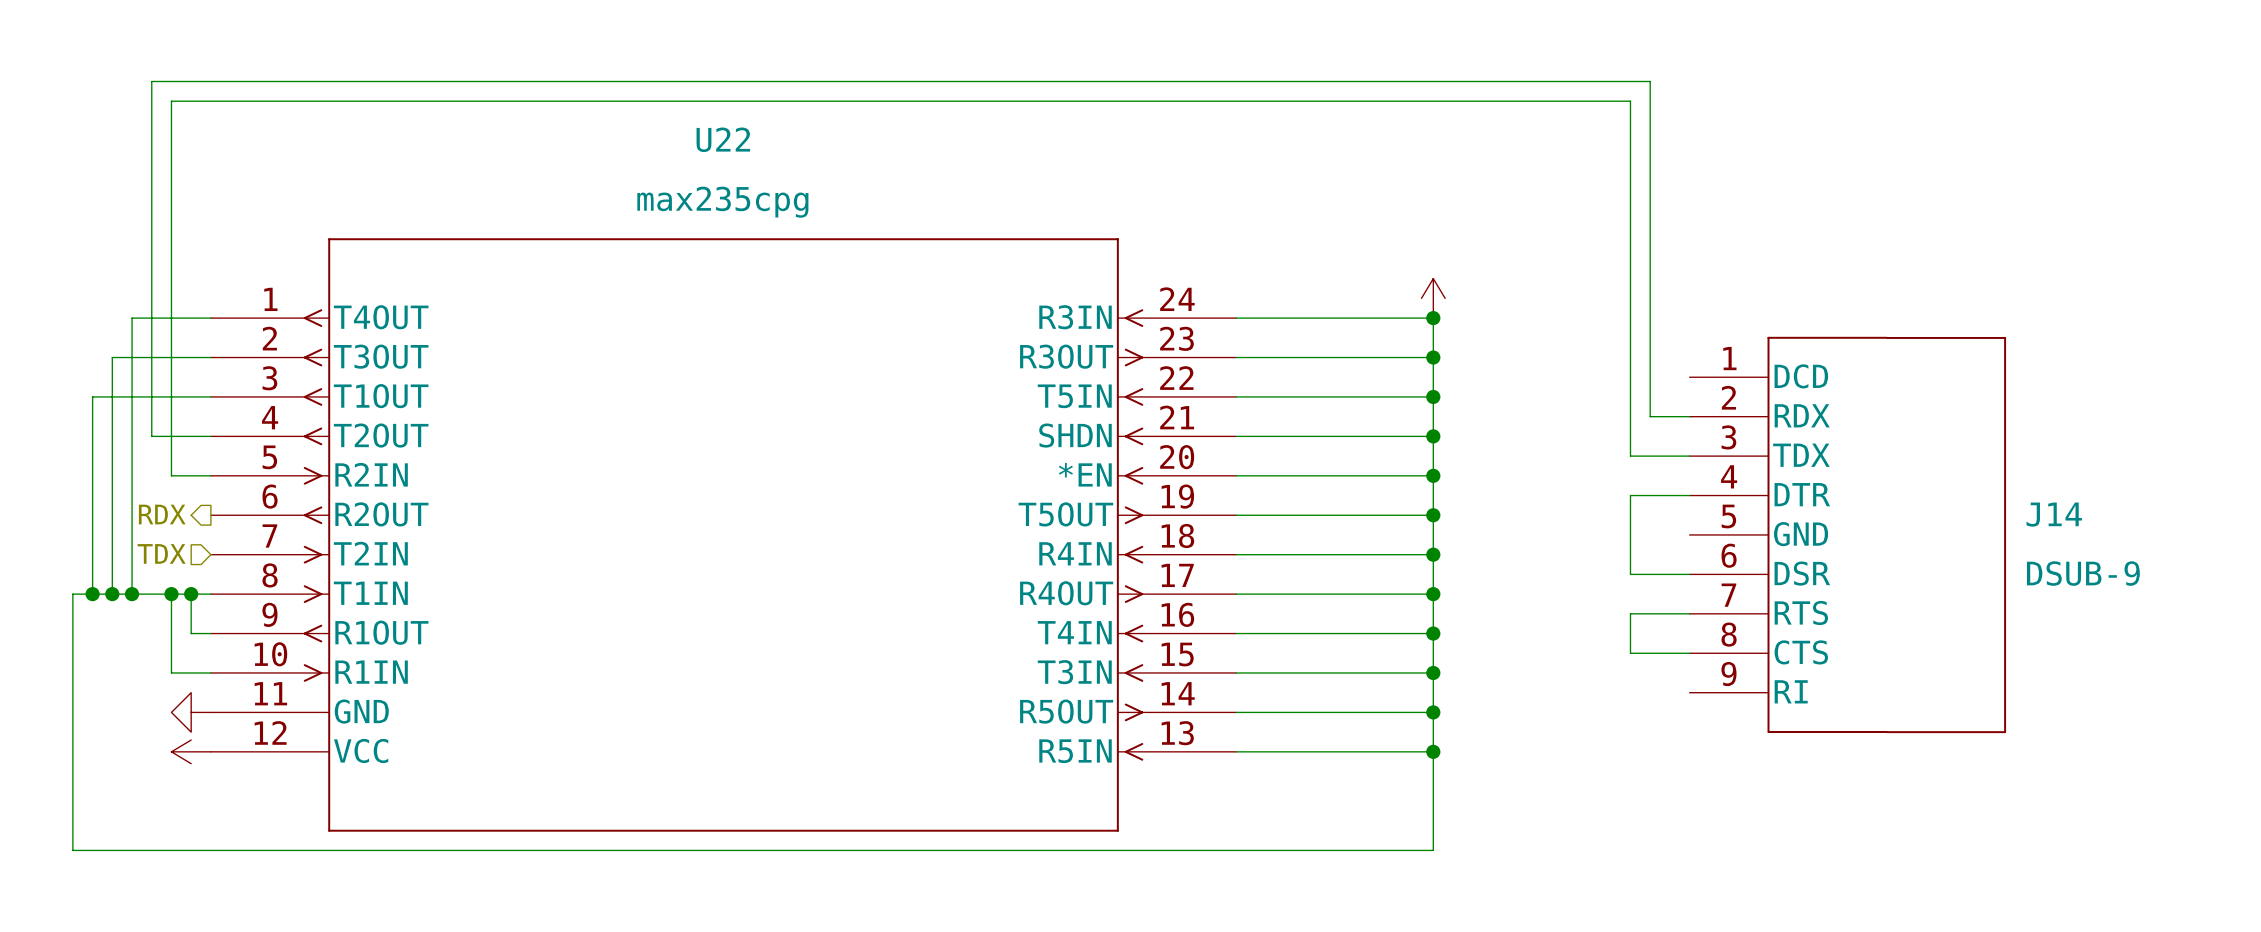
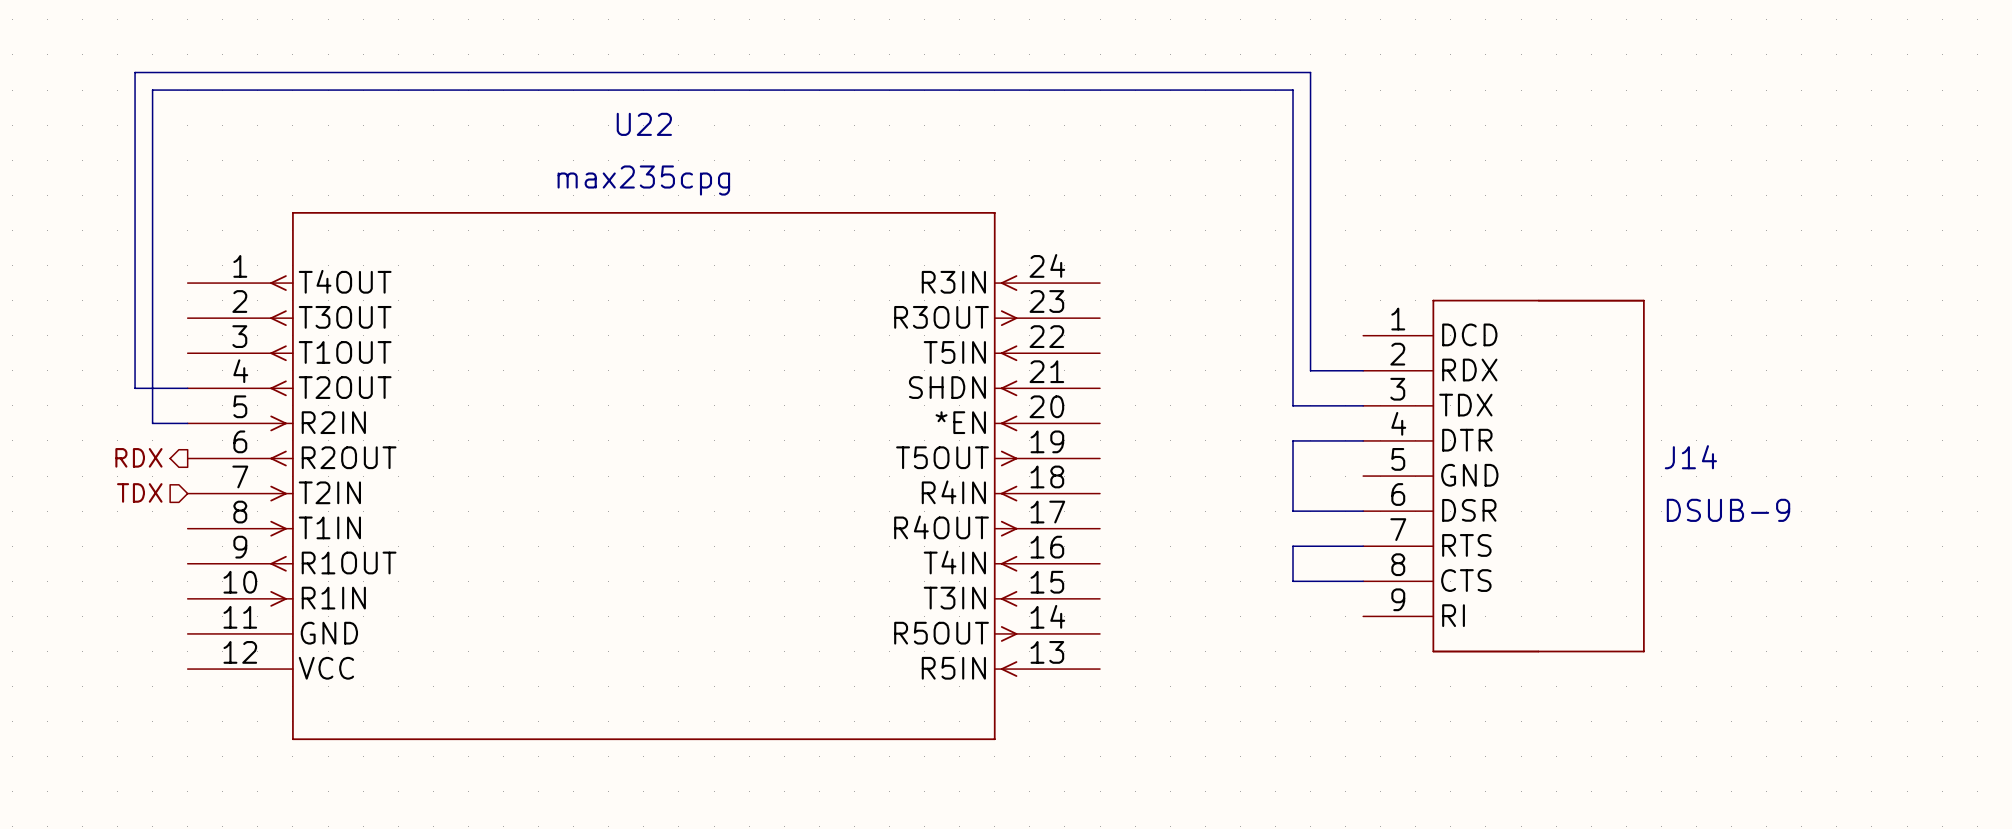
wire: (1472, 81) (1650, 81) (1650, 416) (1689, 416) -> (1310, 72) (1310, 370) (1363, 370)
wire: (1453, 101) (1630, 101) (1630, 456) (1689, 456) -> (1293, 90) (1293, 405) (1363, 405)
power symbol: (1433, 298) -> none
wire: (210, 318) (132, 318) (132, 594) -> none
wire: (1236, 318) (1433, 318) (1433, 850) (72, 850) (72, 594) (210, 594) -> none
junction: (1433, 318) -> none
wire: (210, 357) (112, 357) (112, 594) -> none
wire: (1236, 357) (1433, 357) -> none
junction: (1433, 357) -> none
wire: (210, 396) (92, 396) (92, 594) -> none
wire: (1236, 396) (1433, 396) -> none
junction: (1433, 396) -> none
wire: (1236, 436) (1433, 436) -> none
junction: (1433, 436) -> none
wire: (1236, 475) (1433, 475) -> none
junction: (1433, 475) -> none
wire: none -> (1363, 440) (1293, 440) (1293, 511) (1363, 511)
wire: (1689, 495) (1630, 495) (1630, 574) (1689, 574) -> none
wire: (1236, 515) (1433, 515) -> none
junction: (1433, 515) -> none
J14 position: (1847, 534) -> (1503, 476)
wire: (1236, 554) (1433, 554) -> none
junction: (1433, 554) -> none
junction: (92, 594) -> none
junction: (112, 594) -> none
junction: (132, 594) -> none
wire: (171, 594) (171, 672) (210, 672) -> none
junction: (171, 594) -> none
wire: (191, 594) (191, 633) (210, 633) -> none
junction: (191, 594) -> none
wire: (1236, 594) (1433, 594) -> none
junction: (1433, 594) -> none
wire: none -> (1363, 546) (1293, 546) (1293, 581) (1363, 581)
wire: (1689, 613) (1630, 613) (1630, 653) (1689, 653) -> none
wire: (1236, 633) (1433, 633) -> none
junction: (1433, 633) -> none
wire: (1236, 672) (1433, 672) -> none
junction: (1433, 672) -> none
power symbol: (191, 712) -> none
wire: (1236, 712) (1433, 712) -> none
junction: (1433, 712) -> none
power symbol: (191, 751) -> none
wire: (1236, 751) (1433, 751) -> none
junction: (1433, 751) -> none

